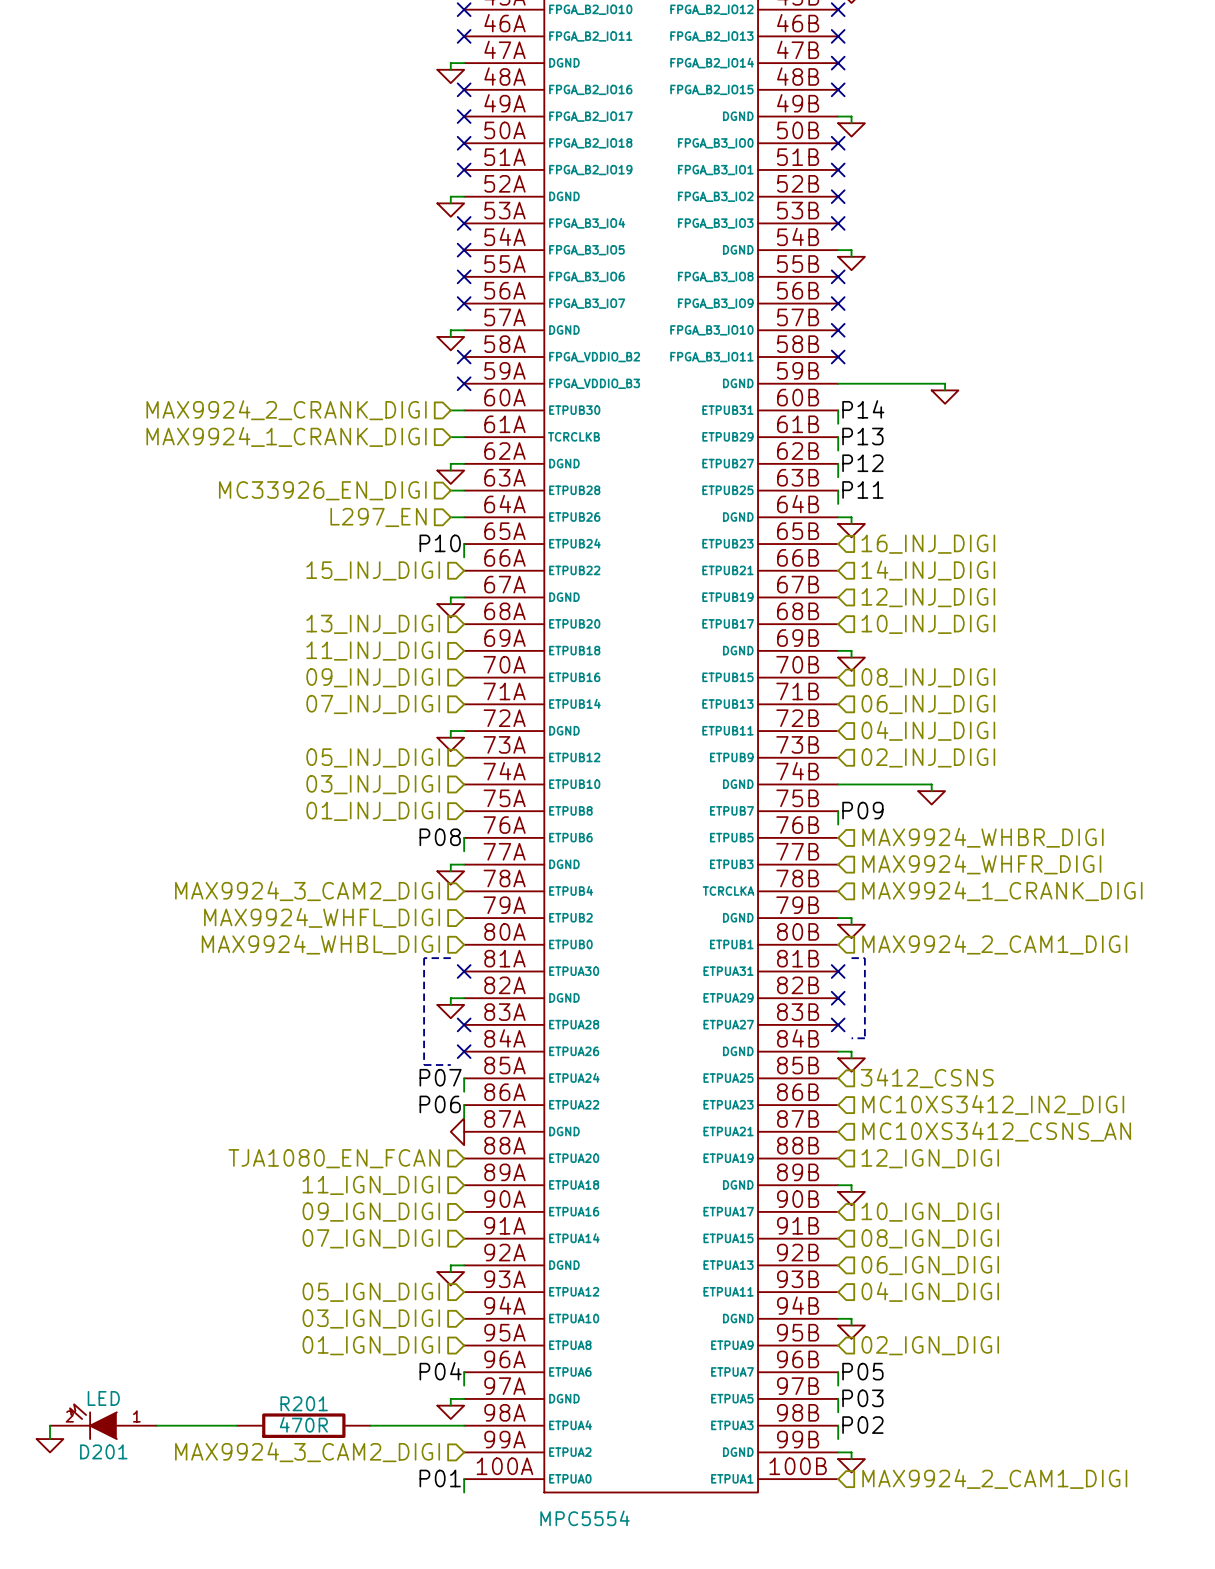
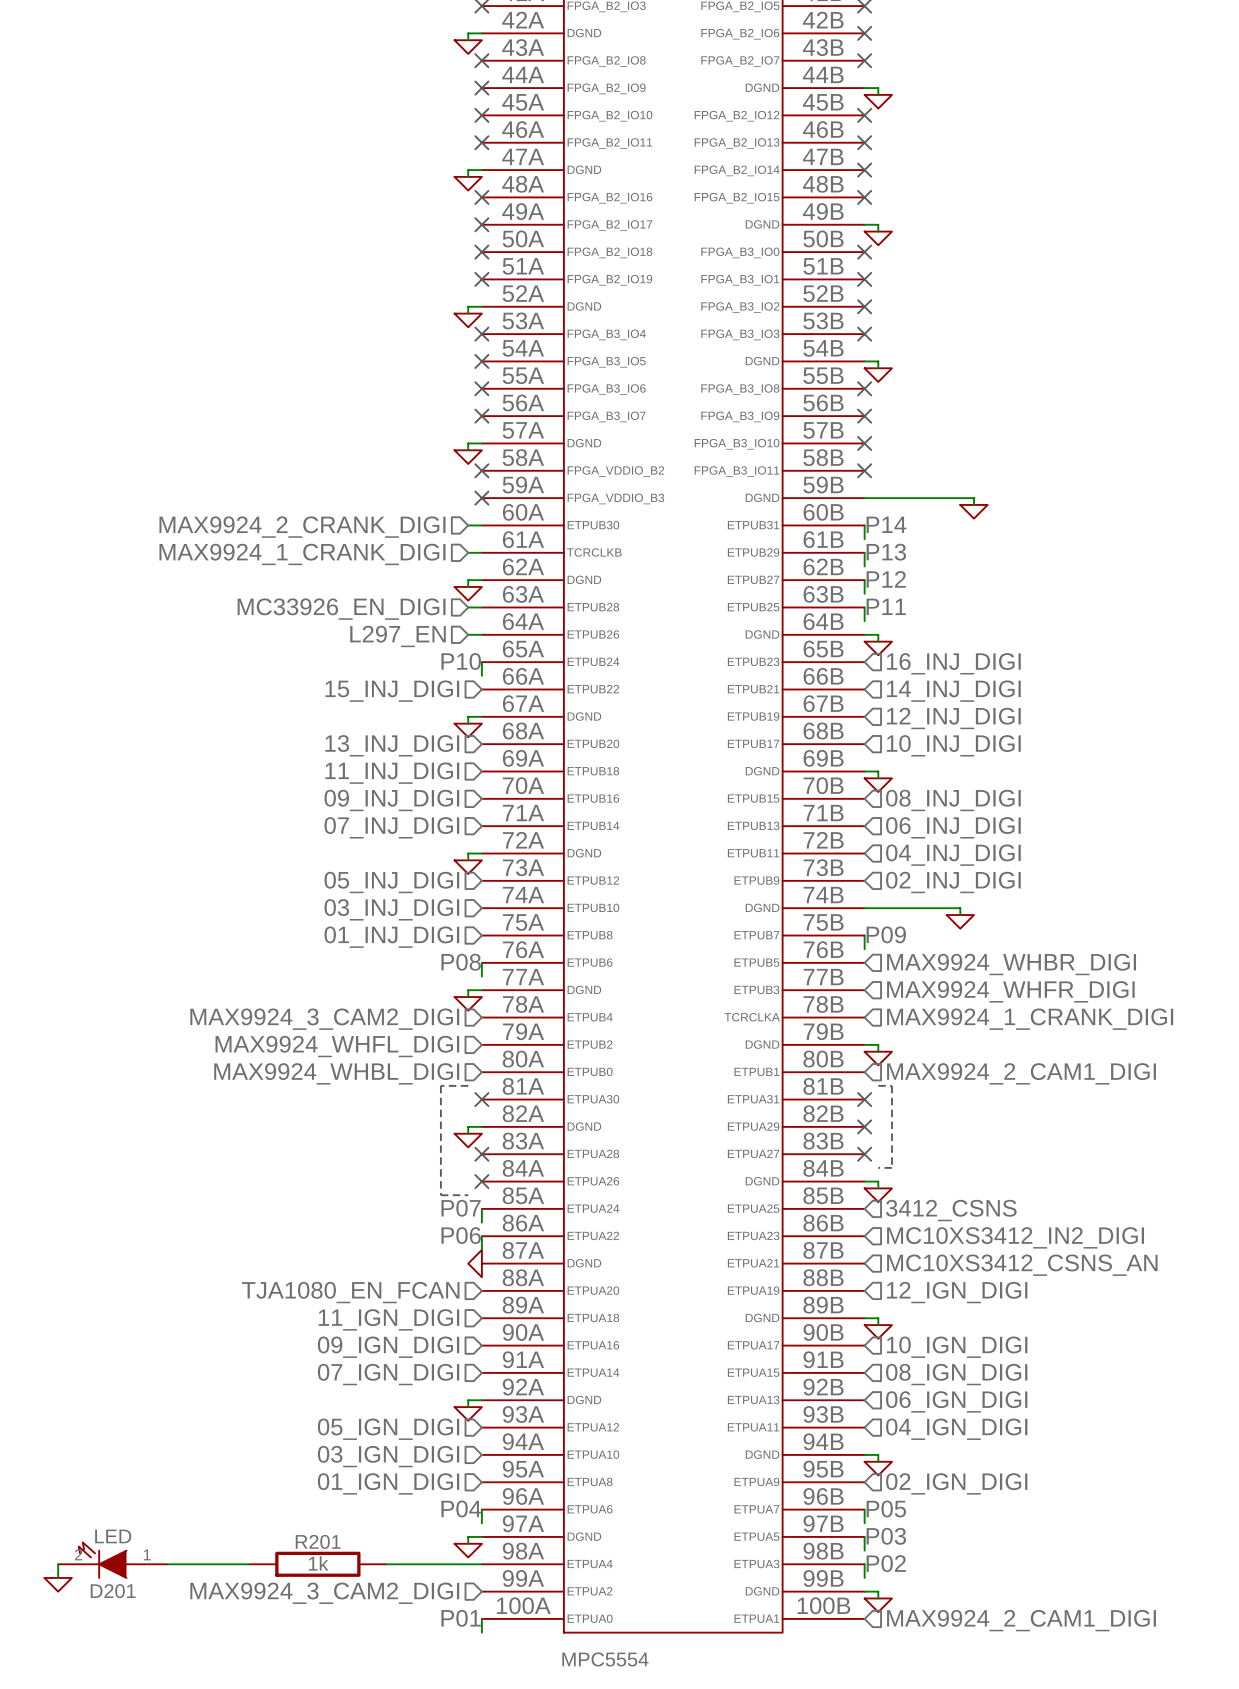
R201 value: 470R (303, 1424) -> 1k (318, 1563)

